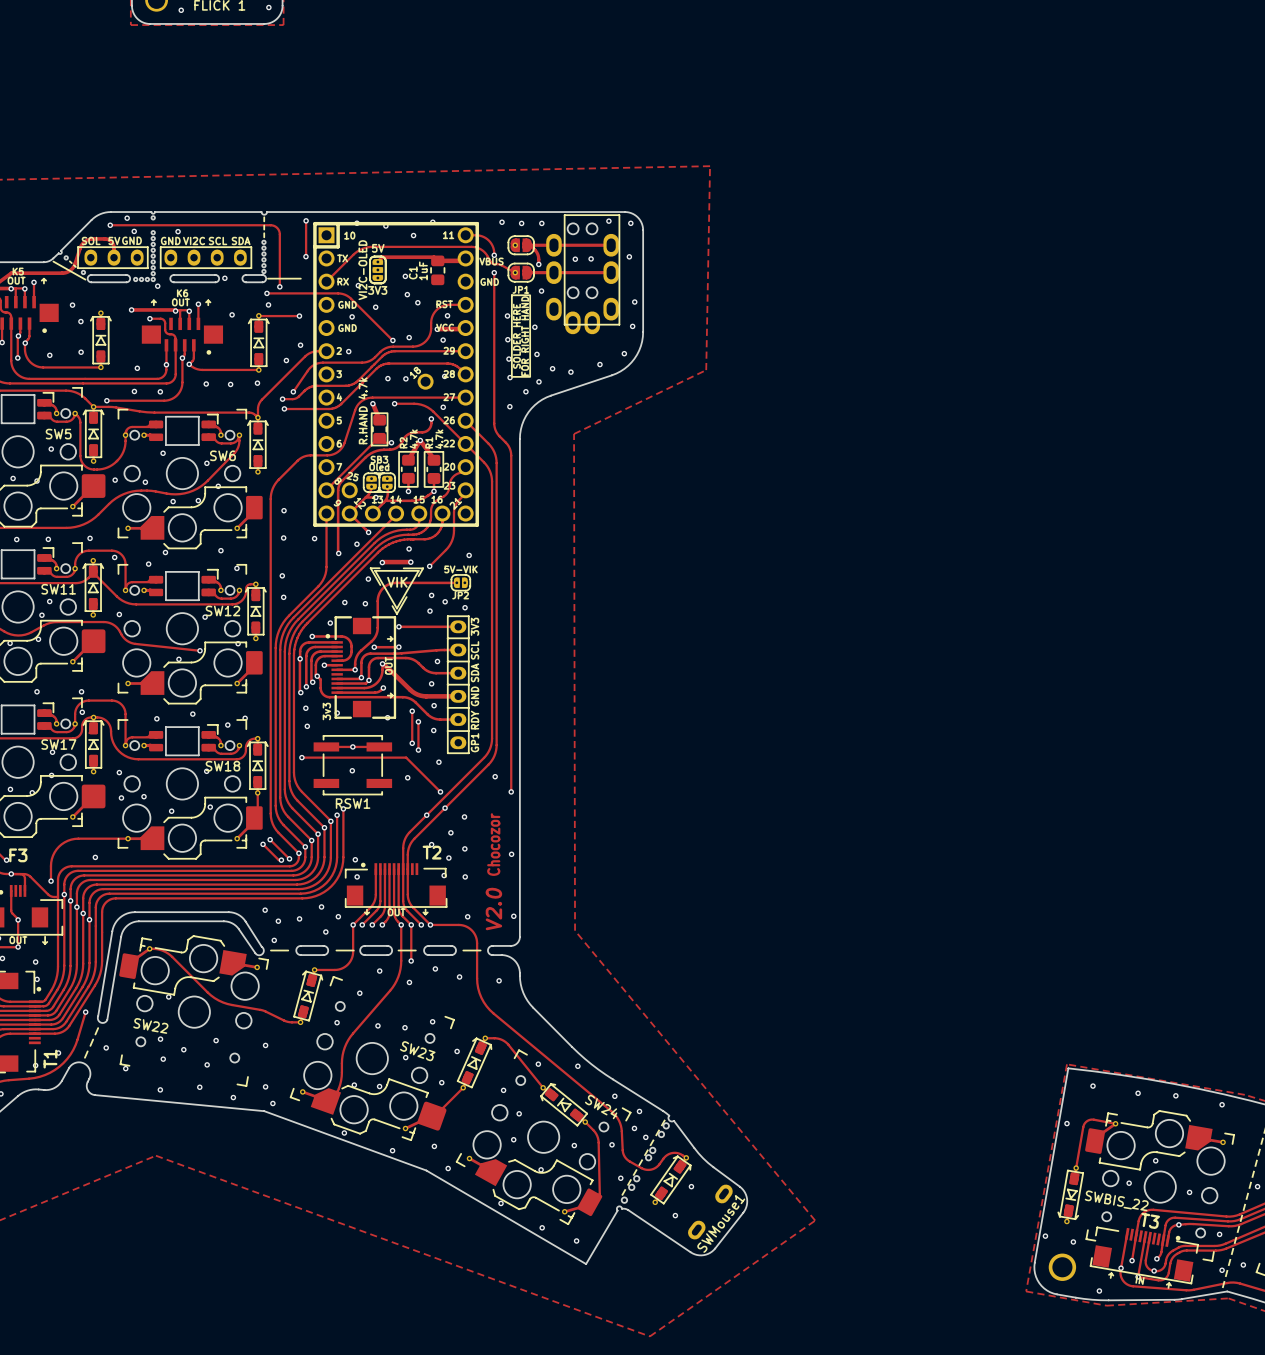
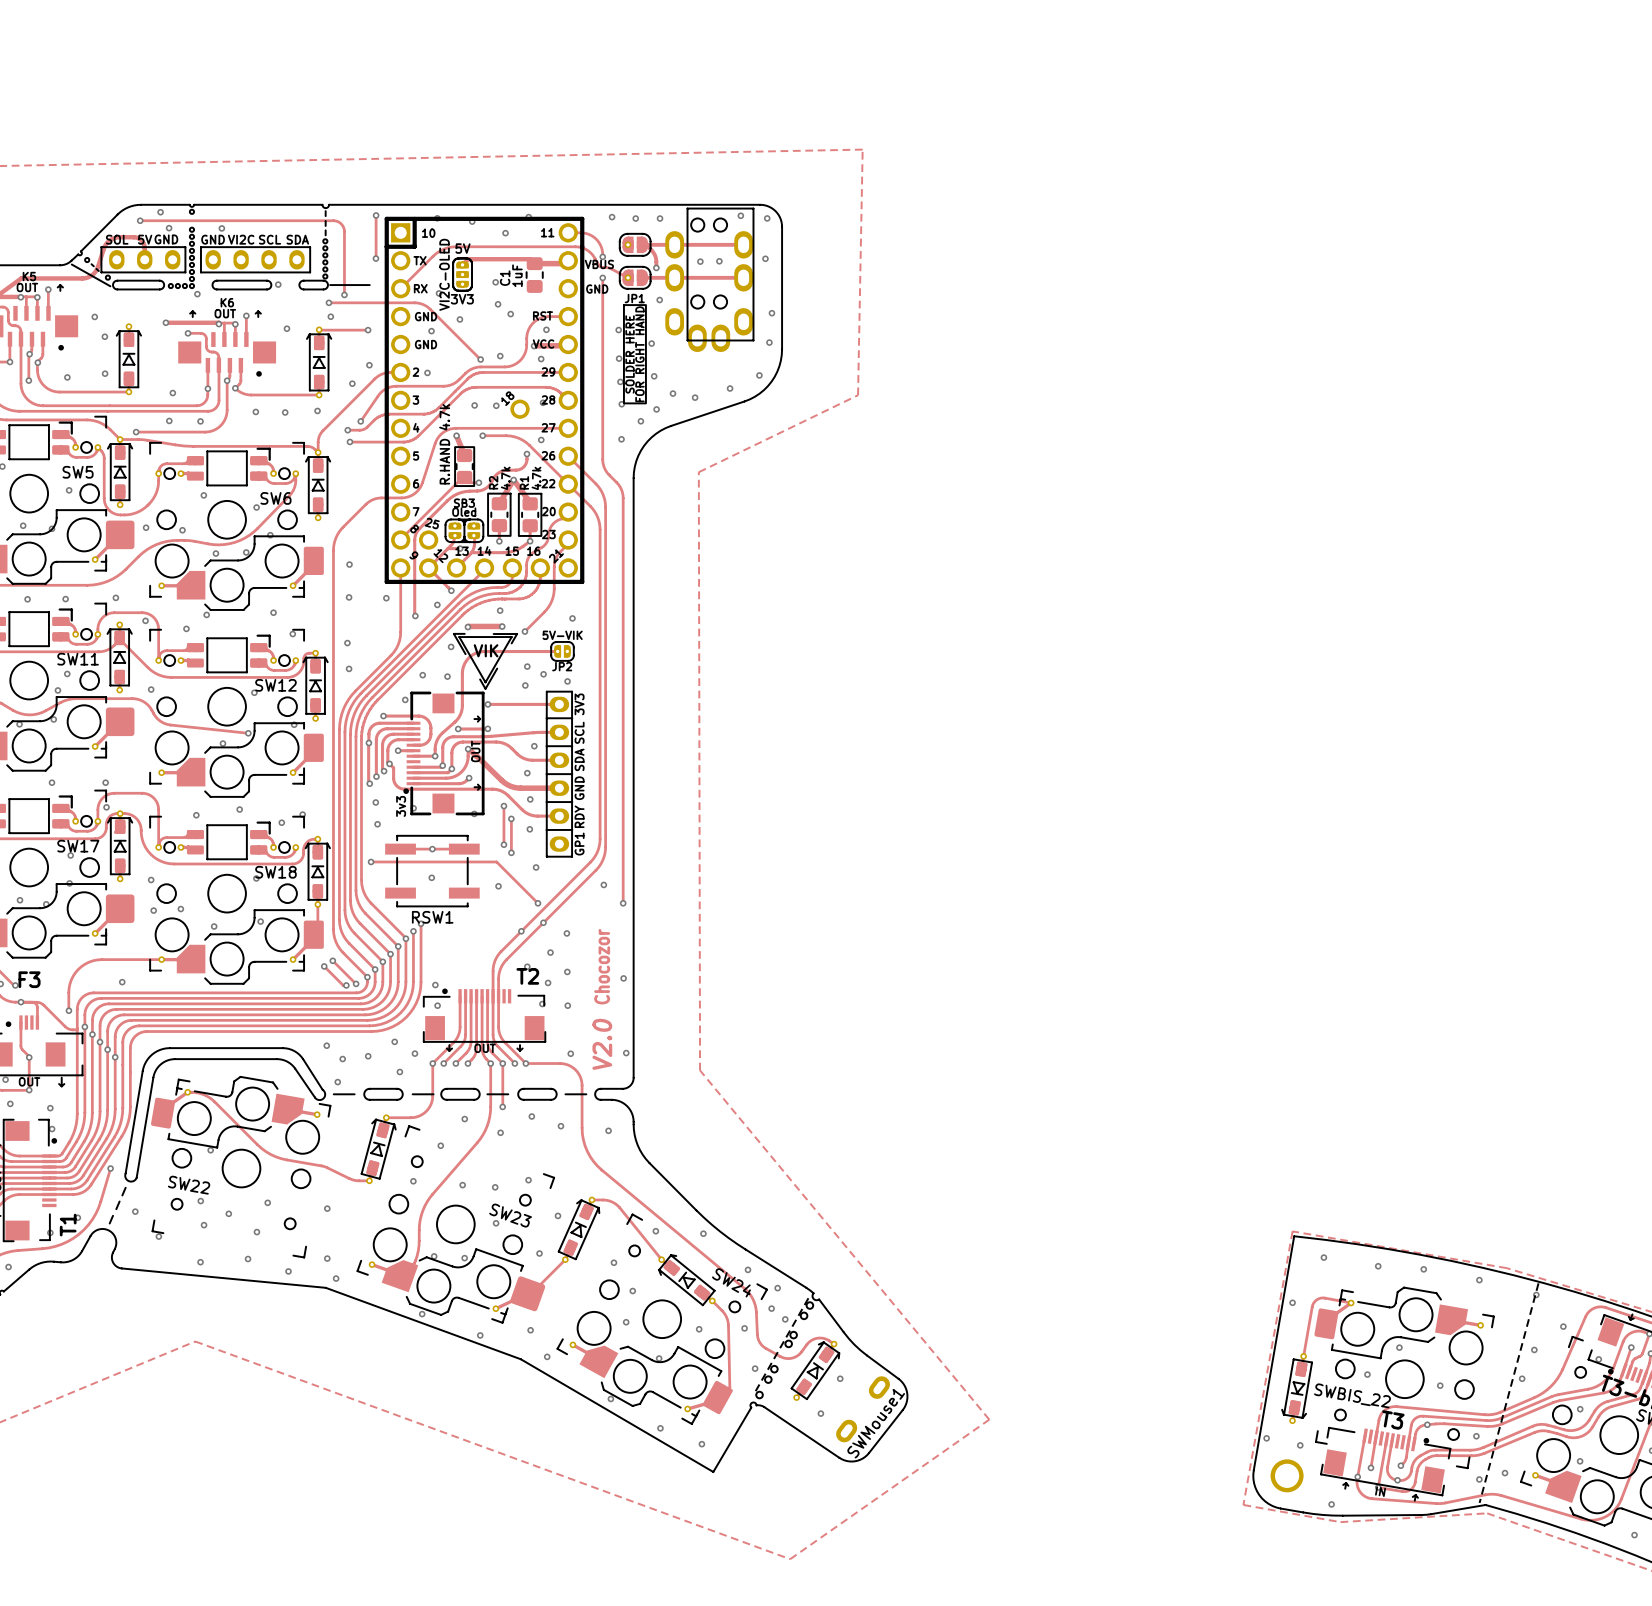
part footprint: [325, 616, 397, 719] -> [403, 691, 485, 816]

